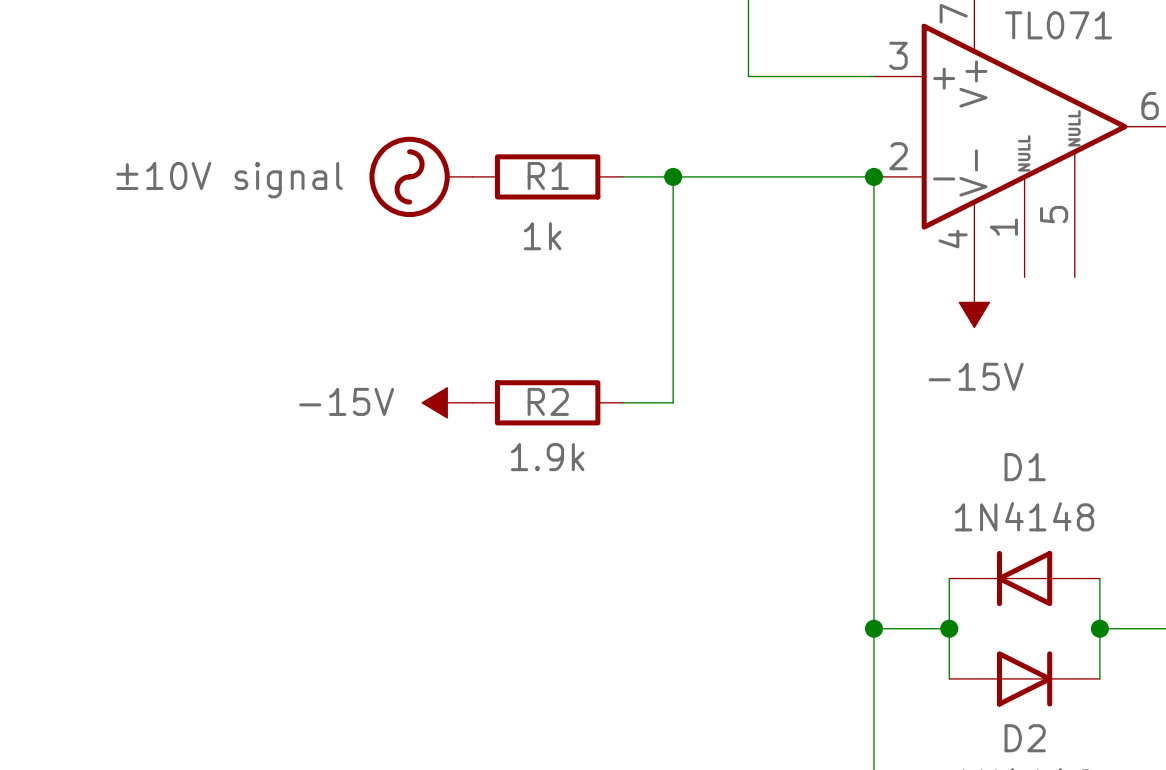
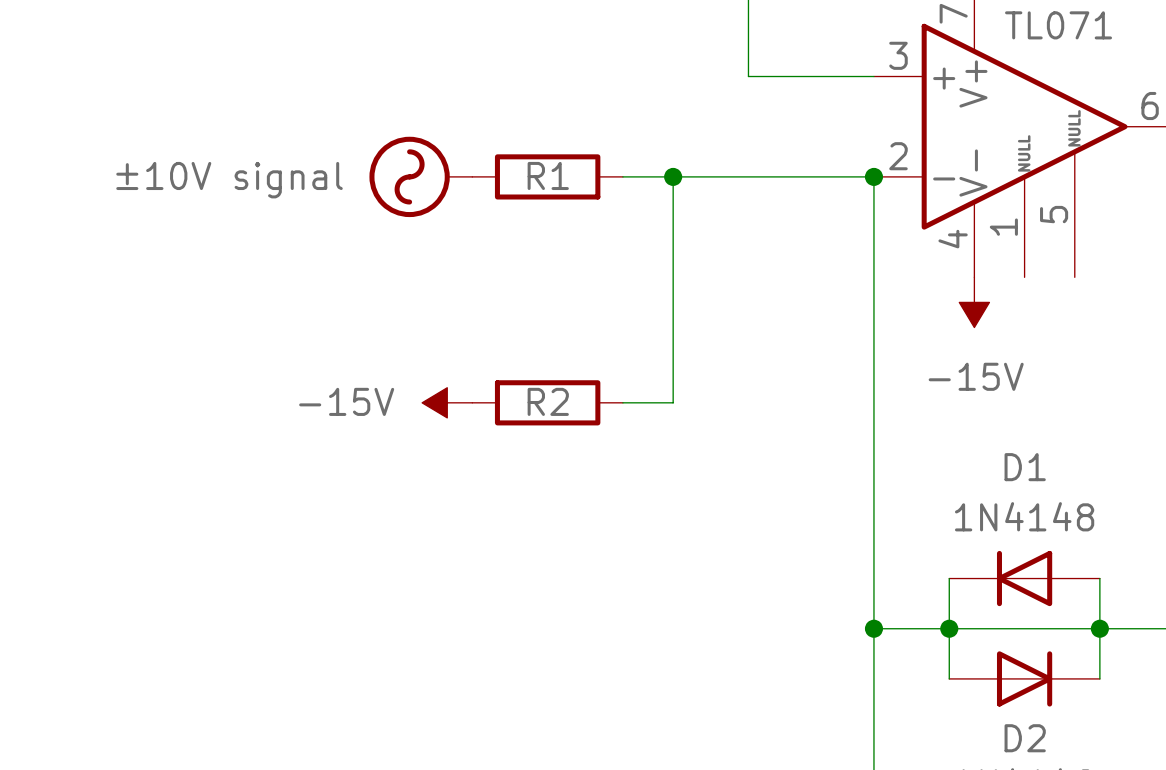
R1 value: 1k (542, 236) -> none
R2 value: 1.9k (547, 457) -> none
wire: none -> (949, 628) (1099, 628)

